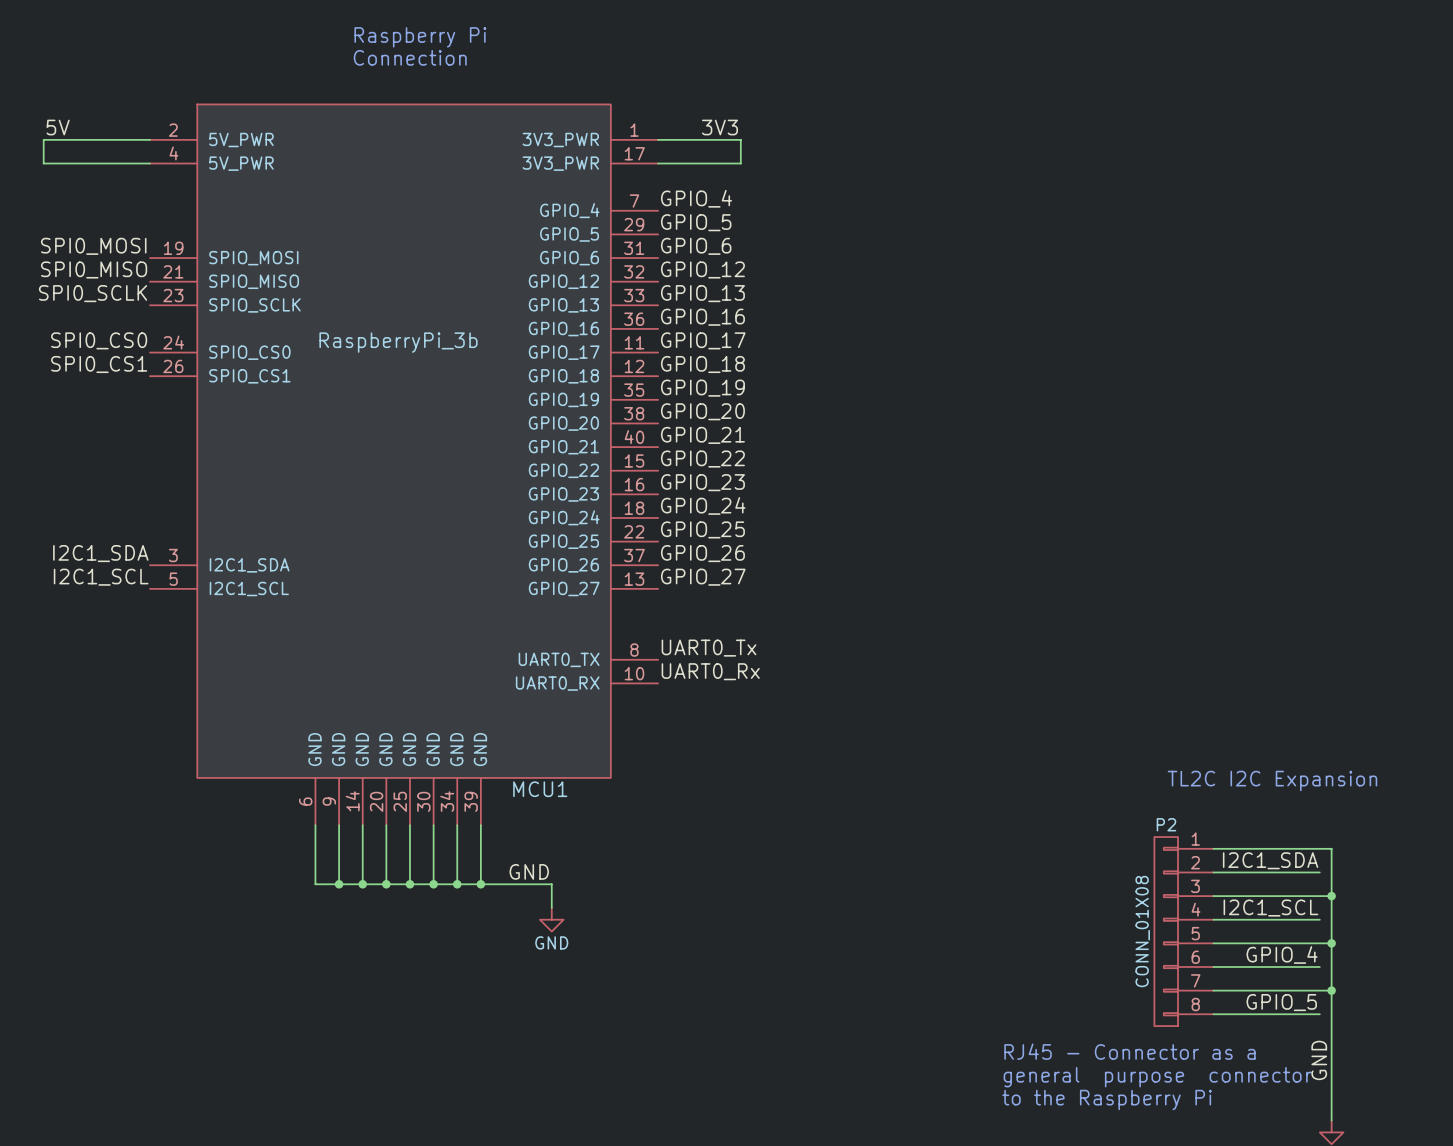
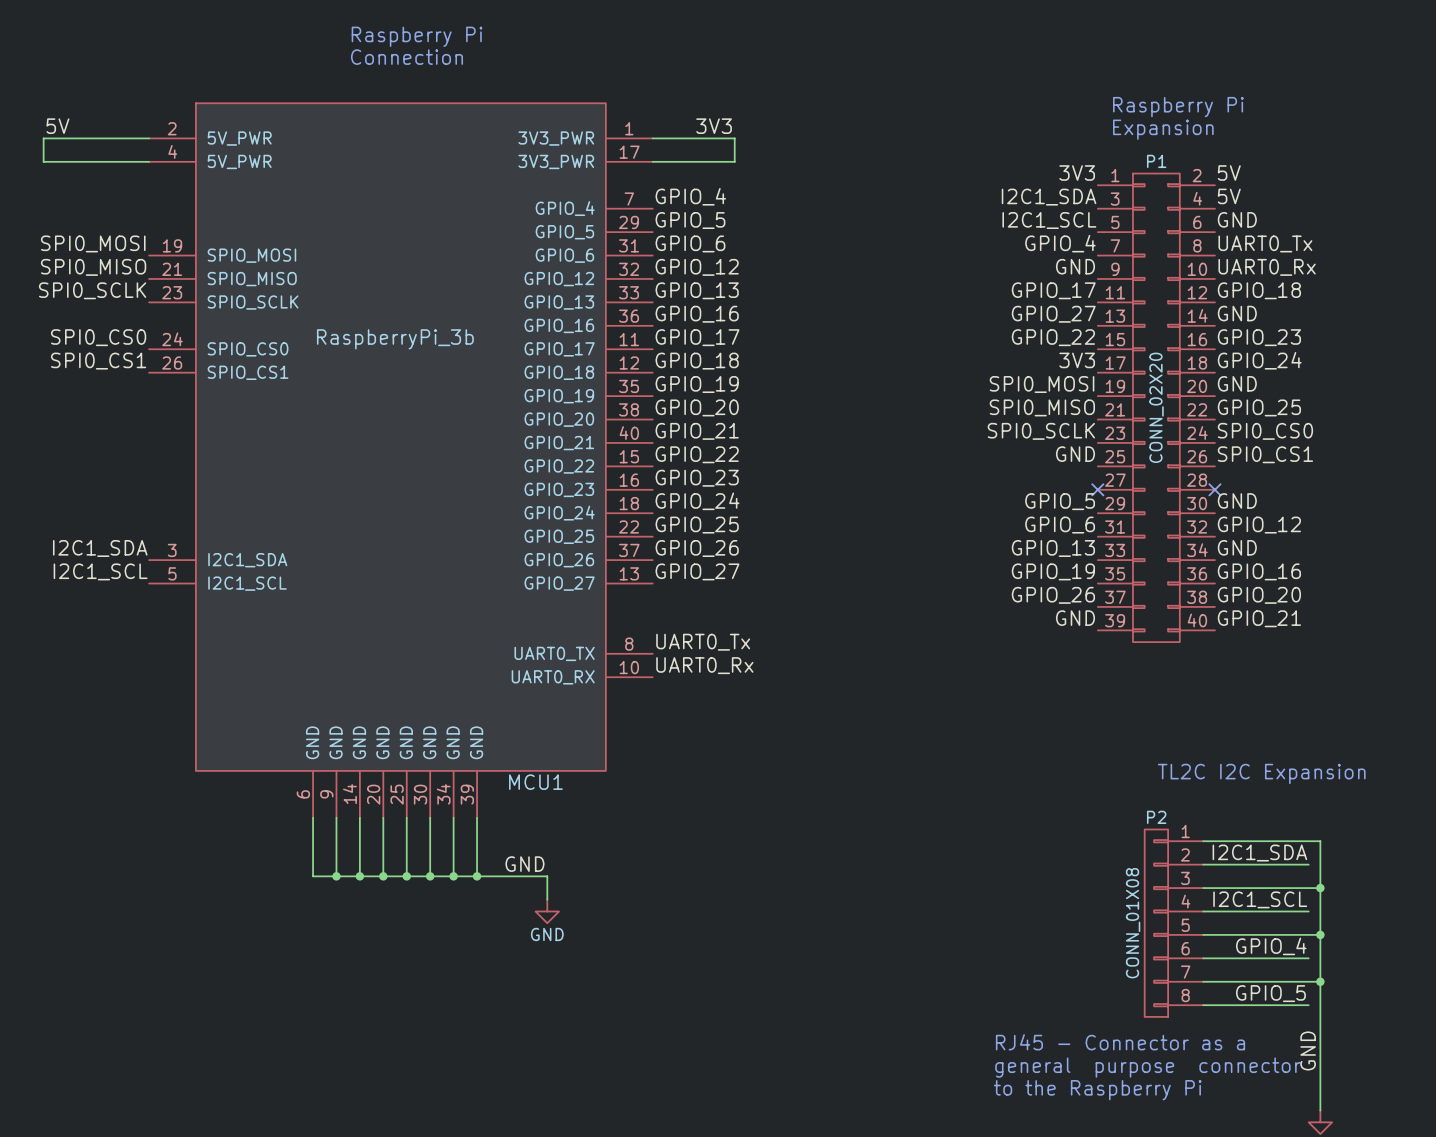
text: none -> Raspberry Pi (1178, 107)
text: none -> Expansion (1163, 129)
label: none -> 3V3 (1077, 173)
label: none -> 5V (1229, 173)
label: none -> 5V (1229, 196)
label: none -> I2C1_SDA (1049, 197)
label: none -> I2C1_SCL (1049, 220)
label: none -> GND (1237, 219)
label: none -> GPIO_4 (1060, 243)
label: none -> UART0_Tx (1265, 243)
label: none -> GND (1075, 266)
label: none -> UART0_Rx (1267, 267)
label: none -> GPIO_17 (1053, 290)
label: none -> GPIO_18 (1259, 290)
label: none -> GND (1237, 313)
label: none -> GPIO_27 (1053, 314)
label: none -> GPIO_22 (1053, 337)
label: none -> GPIO_23 (1259, 337)
label: none -> 3V3 (1077, 360)
label: none -> GPIO_24 (1259, 360)
label: none -> GND (1237, 383)
label: none -> SPI0_MOSI (1042, 384)
label: none -> SPI0_MISO (1042, 407)
P1: none -> CONN_02X20 (1156, 407)
label: none -> GPIO_25 (1259, 407)
label: none -> SPI0_SCLK (1041, 431)
label: none -> SPI0_CS0 (1265, 431)
label: none -> GND (1075, 454)
label: none -> SPI0_CS1 (1265, 454)
no-connect mark: none -> (1097, 489)
no-connect mark: none -> (1214, 489)
label: none -> GND (1237, 500)
label: none -> GPIO_5 (1060, 501)
label: none -> GPIO_6 (1060, 525)
label: none -> GPIO_12 (1259, 525)
label: none -> GND (1237, 547)
label: none -> GPIO_13 (1053, 548)
label: none -> GPIO_19 (1053, 571)
label: none -> GPIO_16 (1259, 571)
label: none -> GPIO_26 (1053, 595)
label: none -> GPIO_20 (1259, 595)
label: none -> GND (1075, 618)
label: none -> GPIO_21 (1259, 618)

